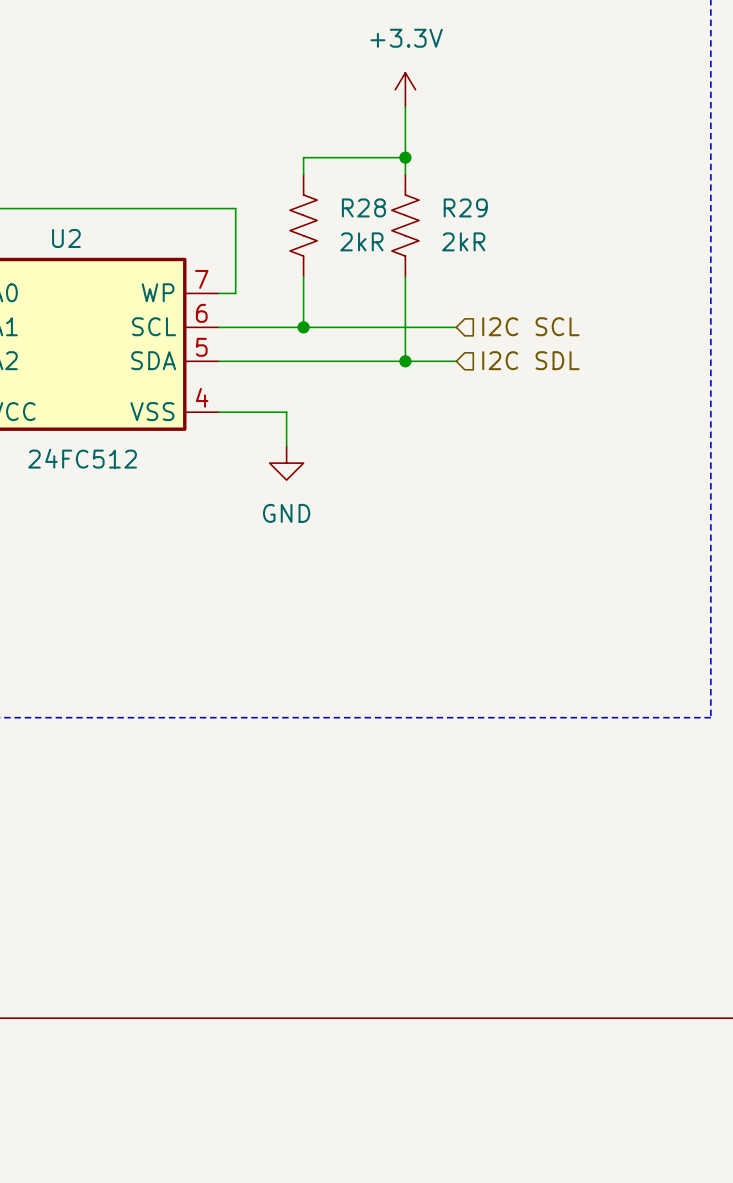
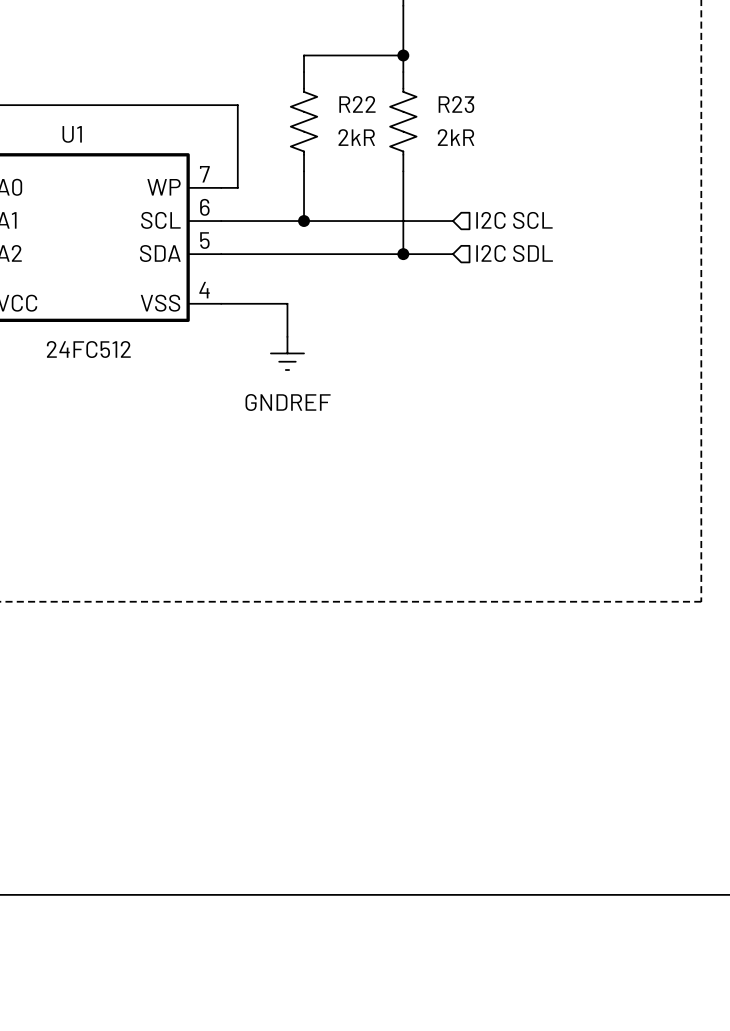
R28 name: R28 (363, 207) -> R22 (357, 104)
R29 name: R29 (465, 207) -> R23 (456, 104)
U2 name: U2 (66, 238) -> U1 (72, 134)
power symbol: GND (286, 463) -> GNDREF (287, 353)

